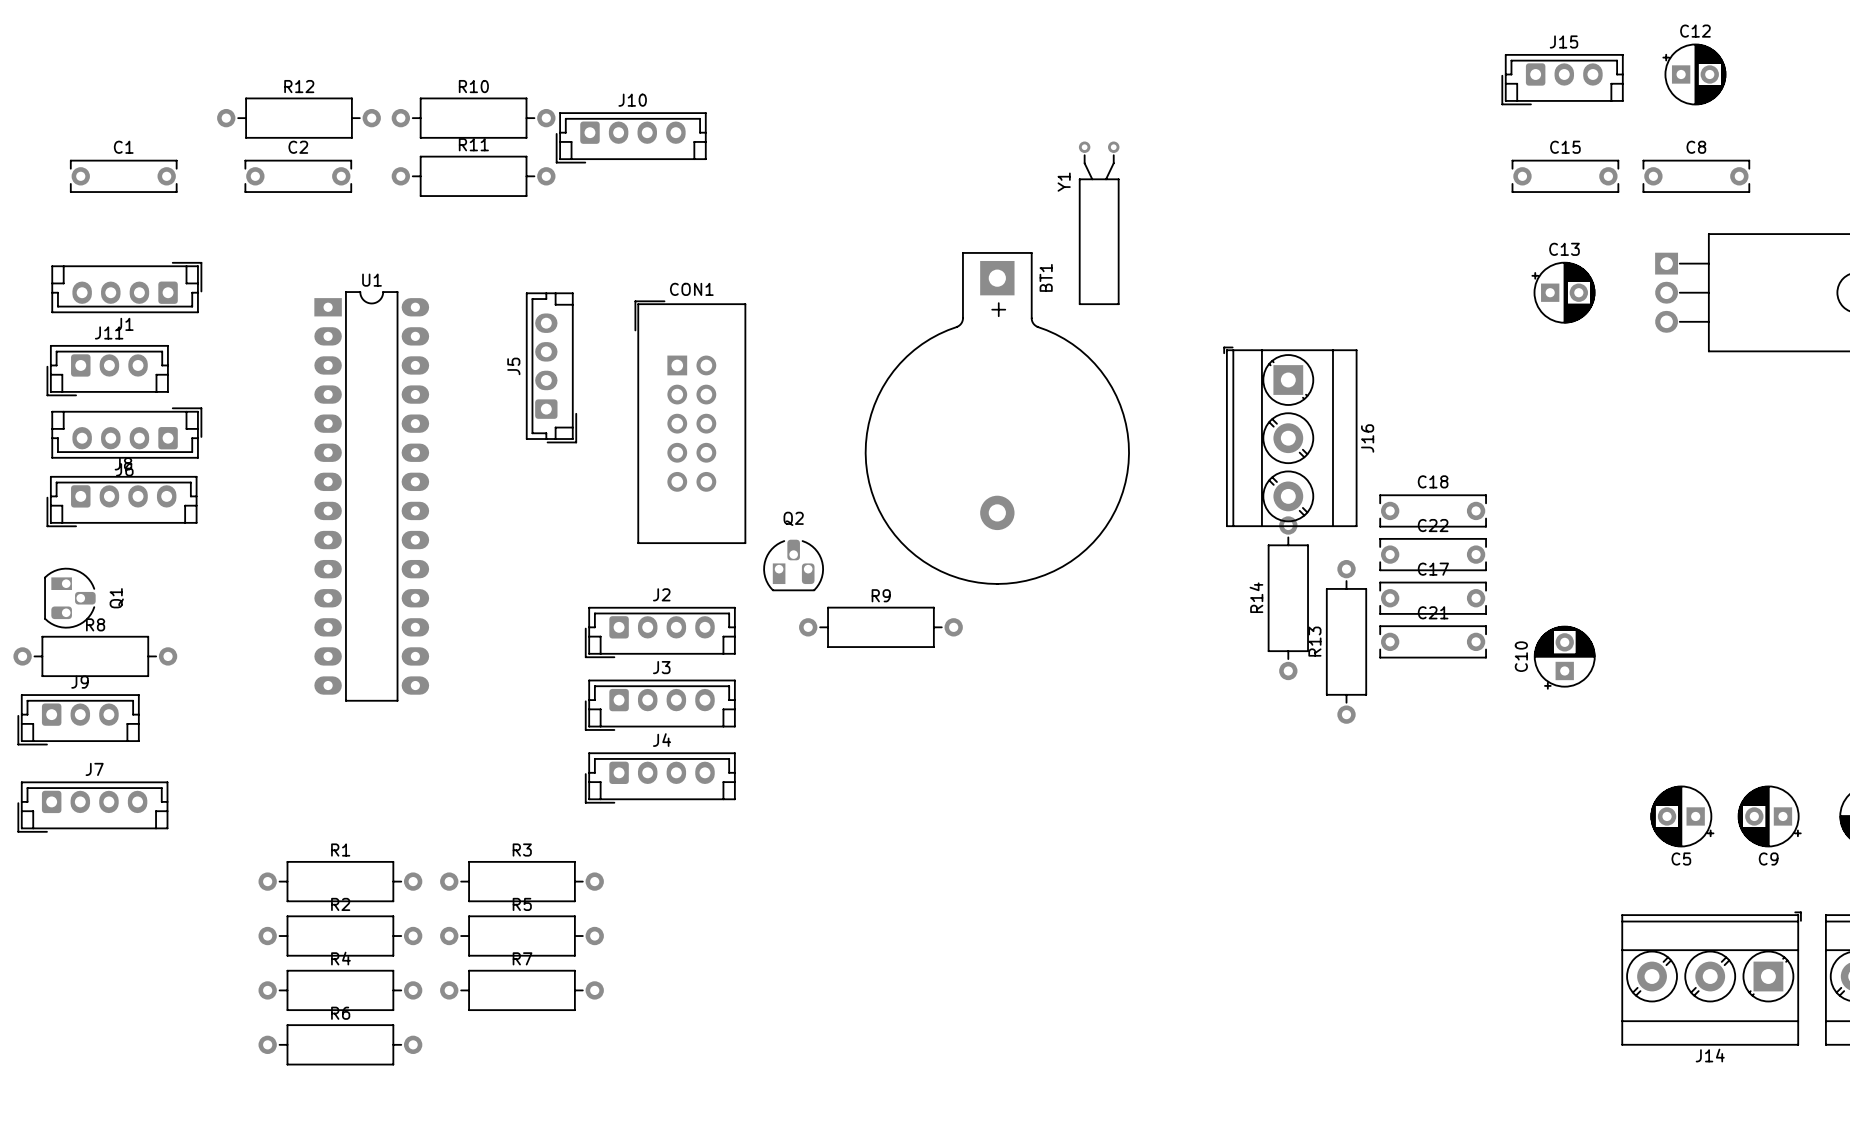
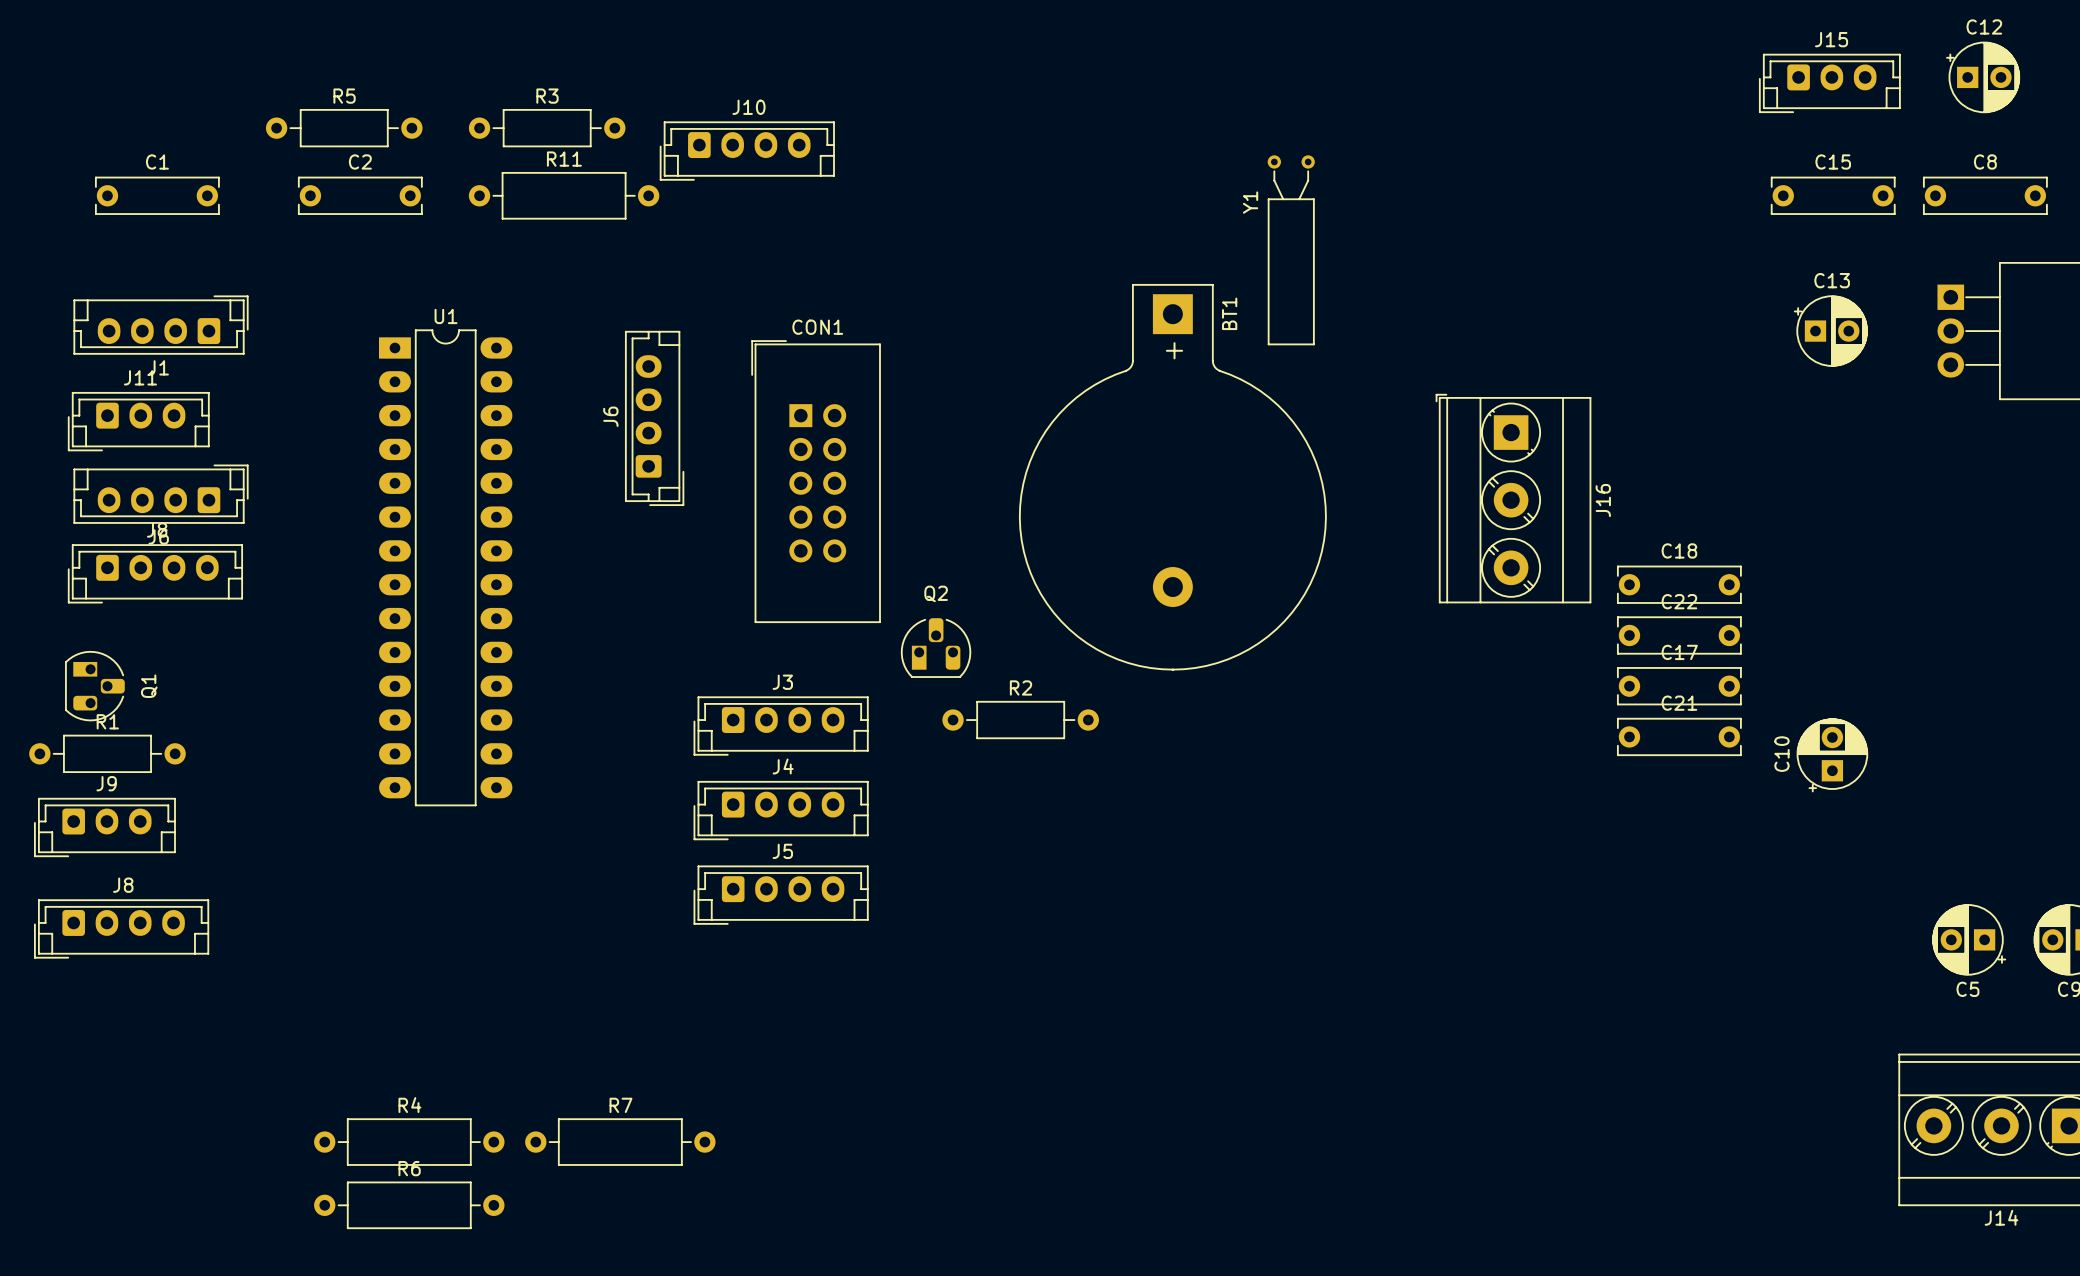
R12: (299, 118) -> none
R10: (473, 118) -> none
J5 name: J5 (513, 366) -> J6 (610, 416)
J2 name: J2 (661, 594) -> J3 (782, 682)
R14: (1288, 598) -> none
R9: (880, 627) -> none
R13: (1346, 641) -> none
R8: (95, 656) -> none
J3 name: J3 (661, 667) -> J4 (783, 766)
J4 name: J4 (662, 740) -> J5 (782, 851)
J7 name: J7 (94, 769) -> J8 (123, 885)
R1 footprint: [258, 861, 423, 902] -> [29, 734, 186, 773]
R3 footprint: [440, 861, 604, 902] -> [468, 109, 626, 148]
R2 footprint: [258, 915, 423, 957] -> [942, 700, 1099, 740]
R5 footprint: [440, 915, 604, 957] -> [265, 109, 423, 148]

